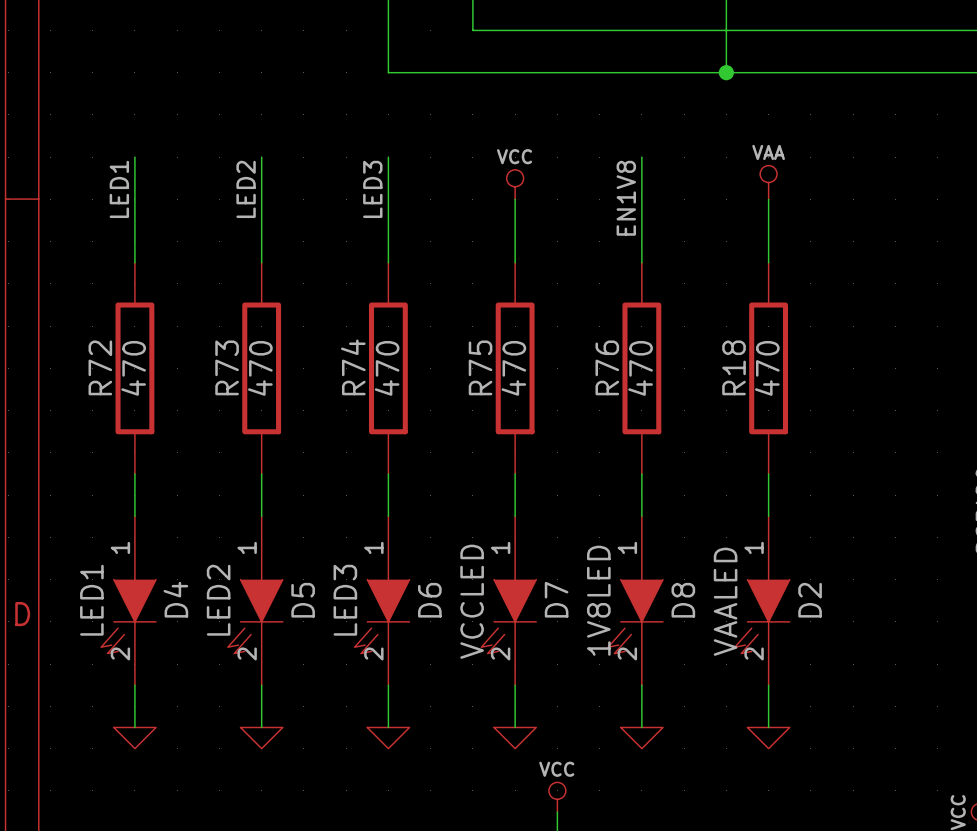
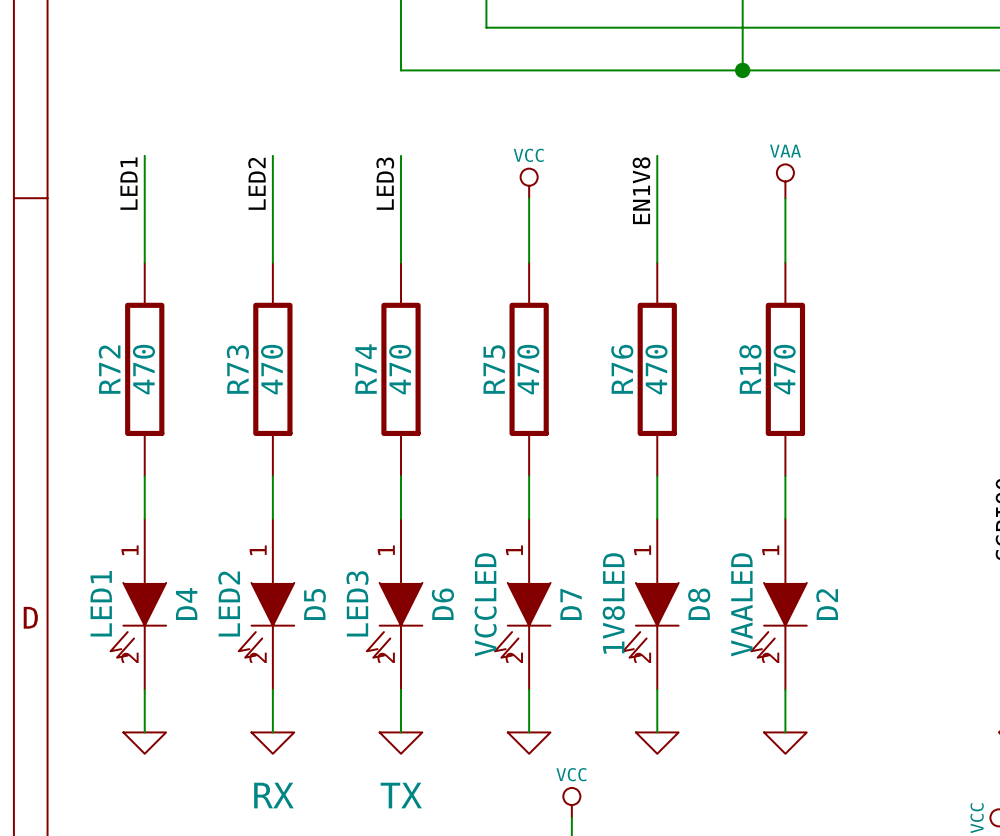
D5 text: none -> RX (273, 795)
D6 text: none -> TX (401, 795)

